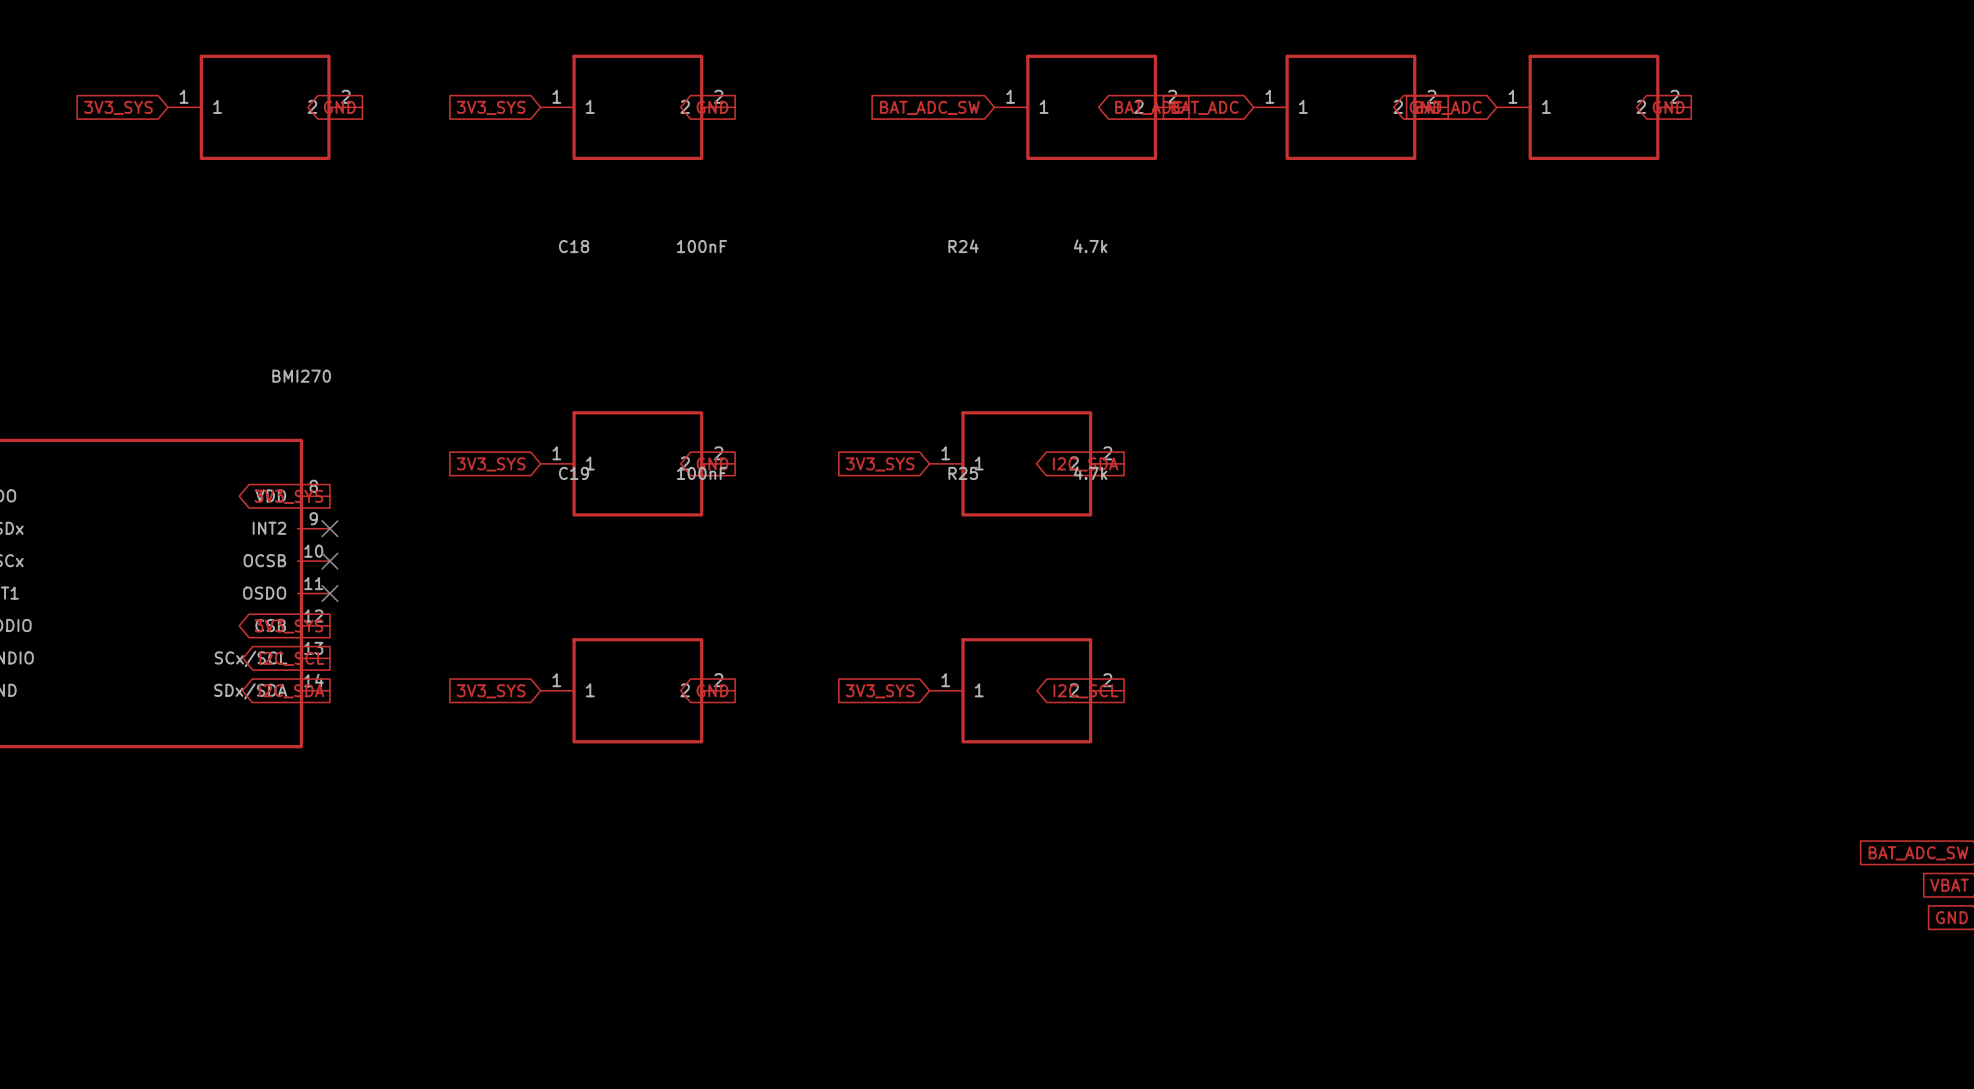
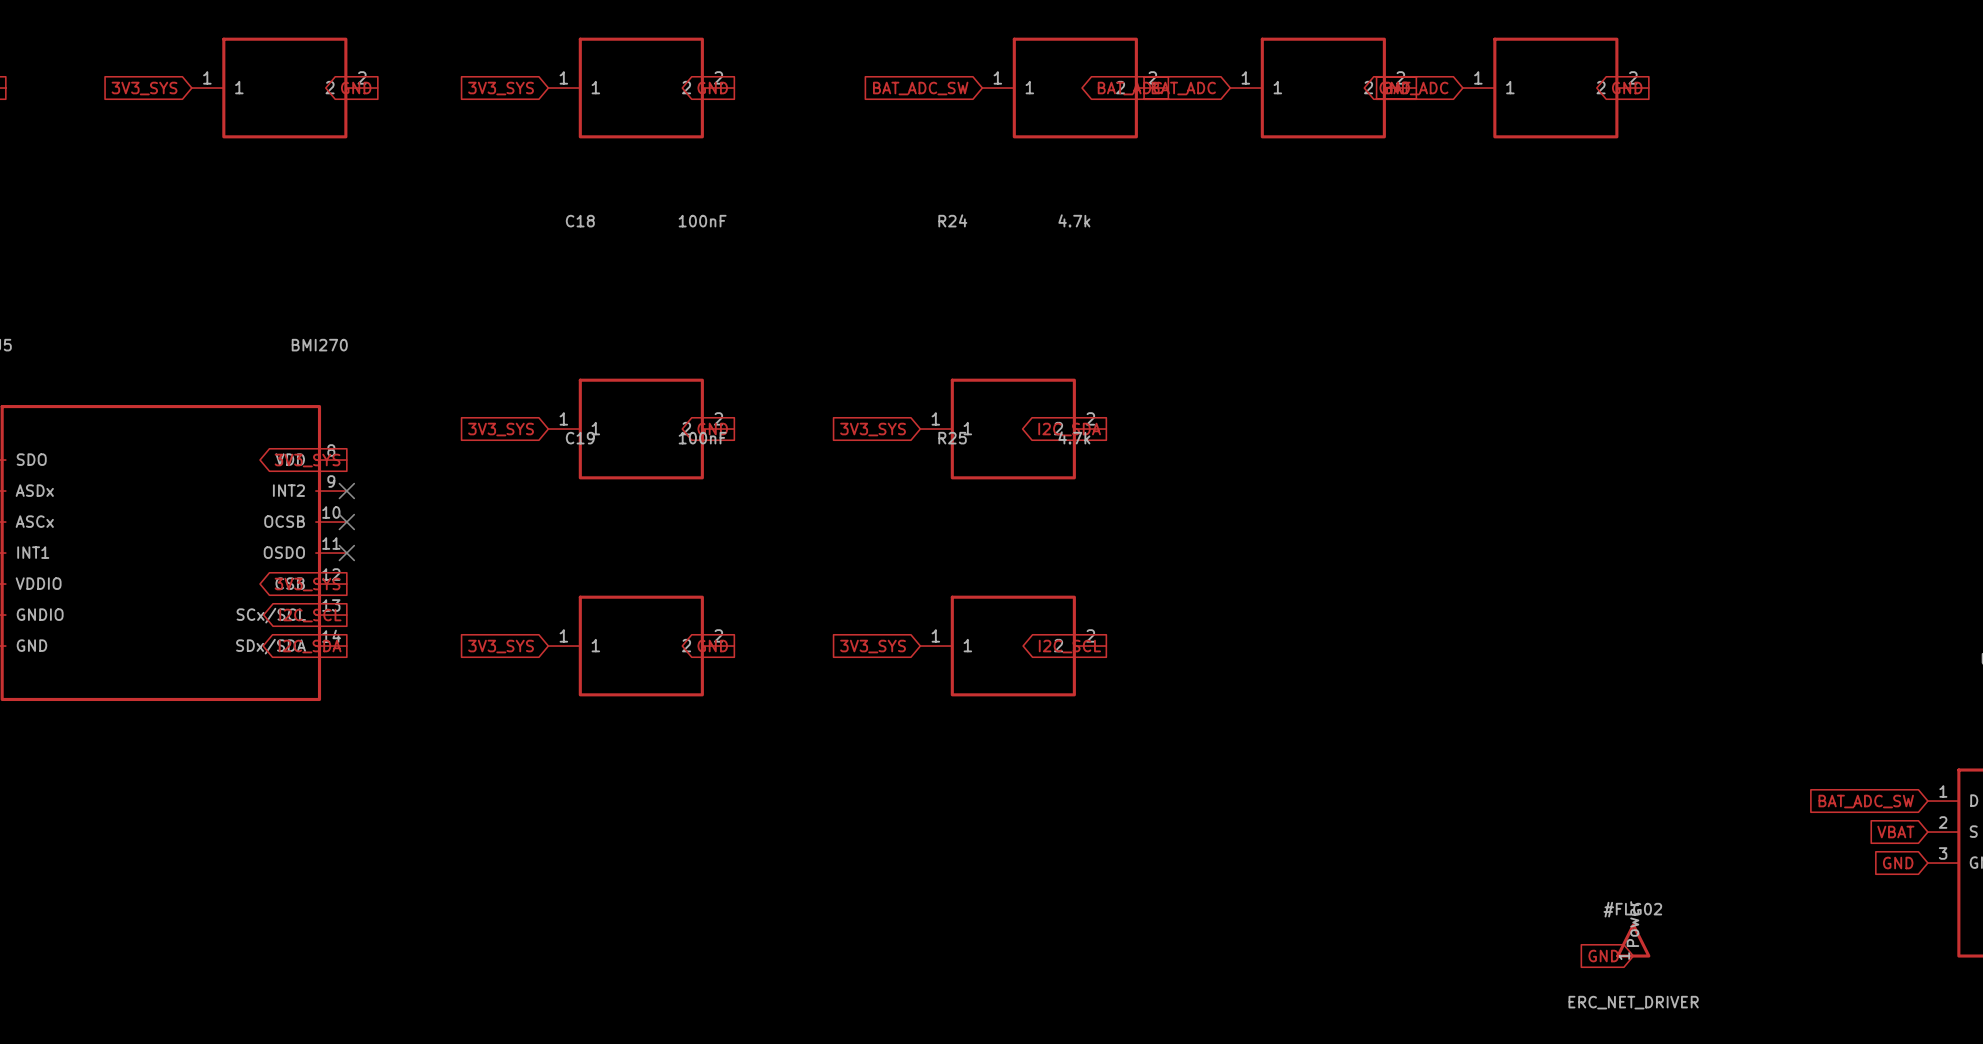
#FLG02: none -> ERC_NET_DRIVER (1633, 940)
global label: none -> GND (1603, 956)

